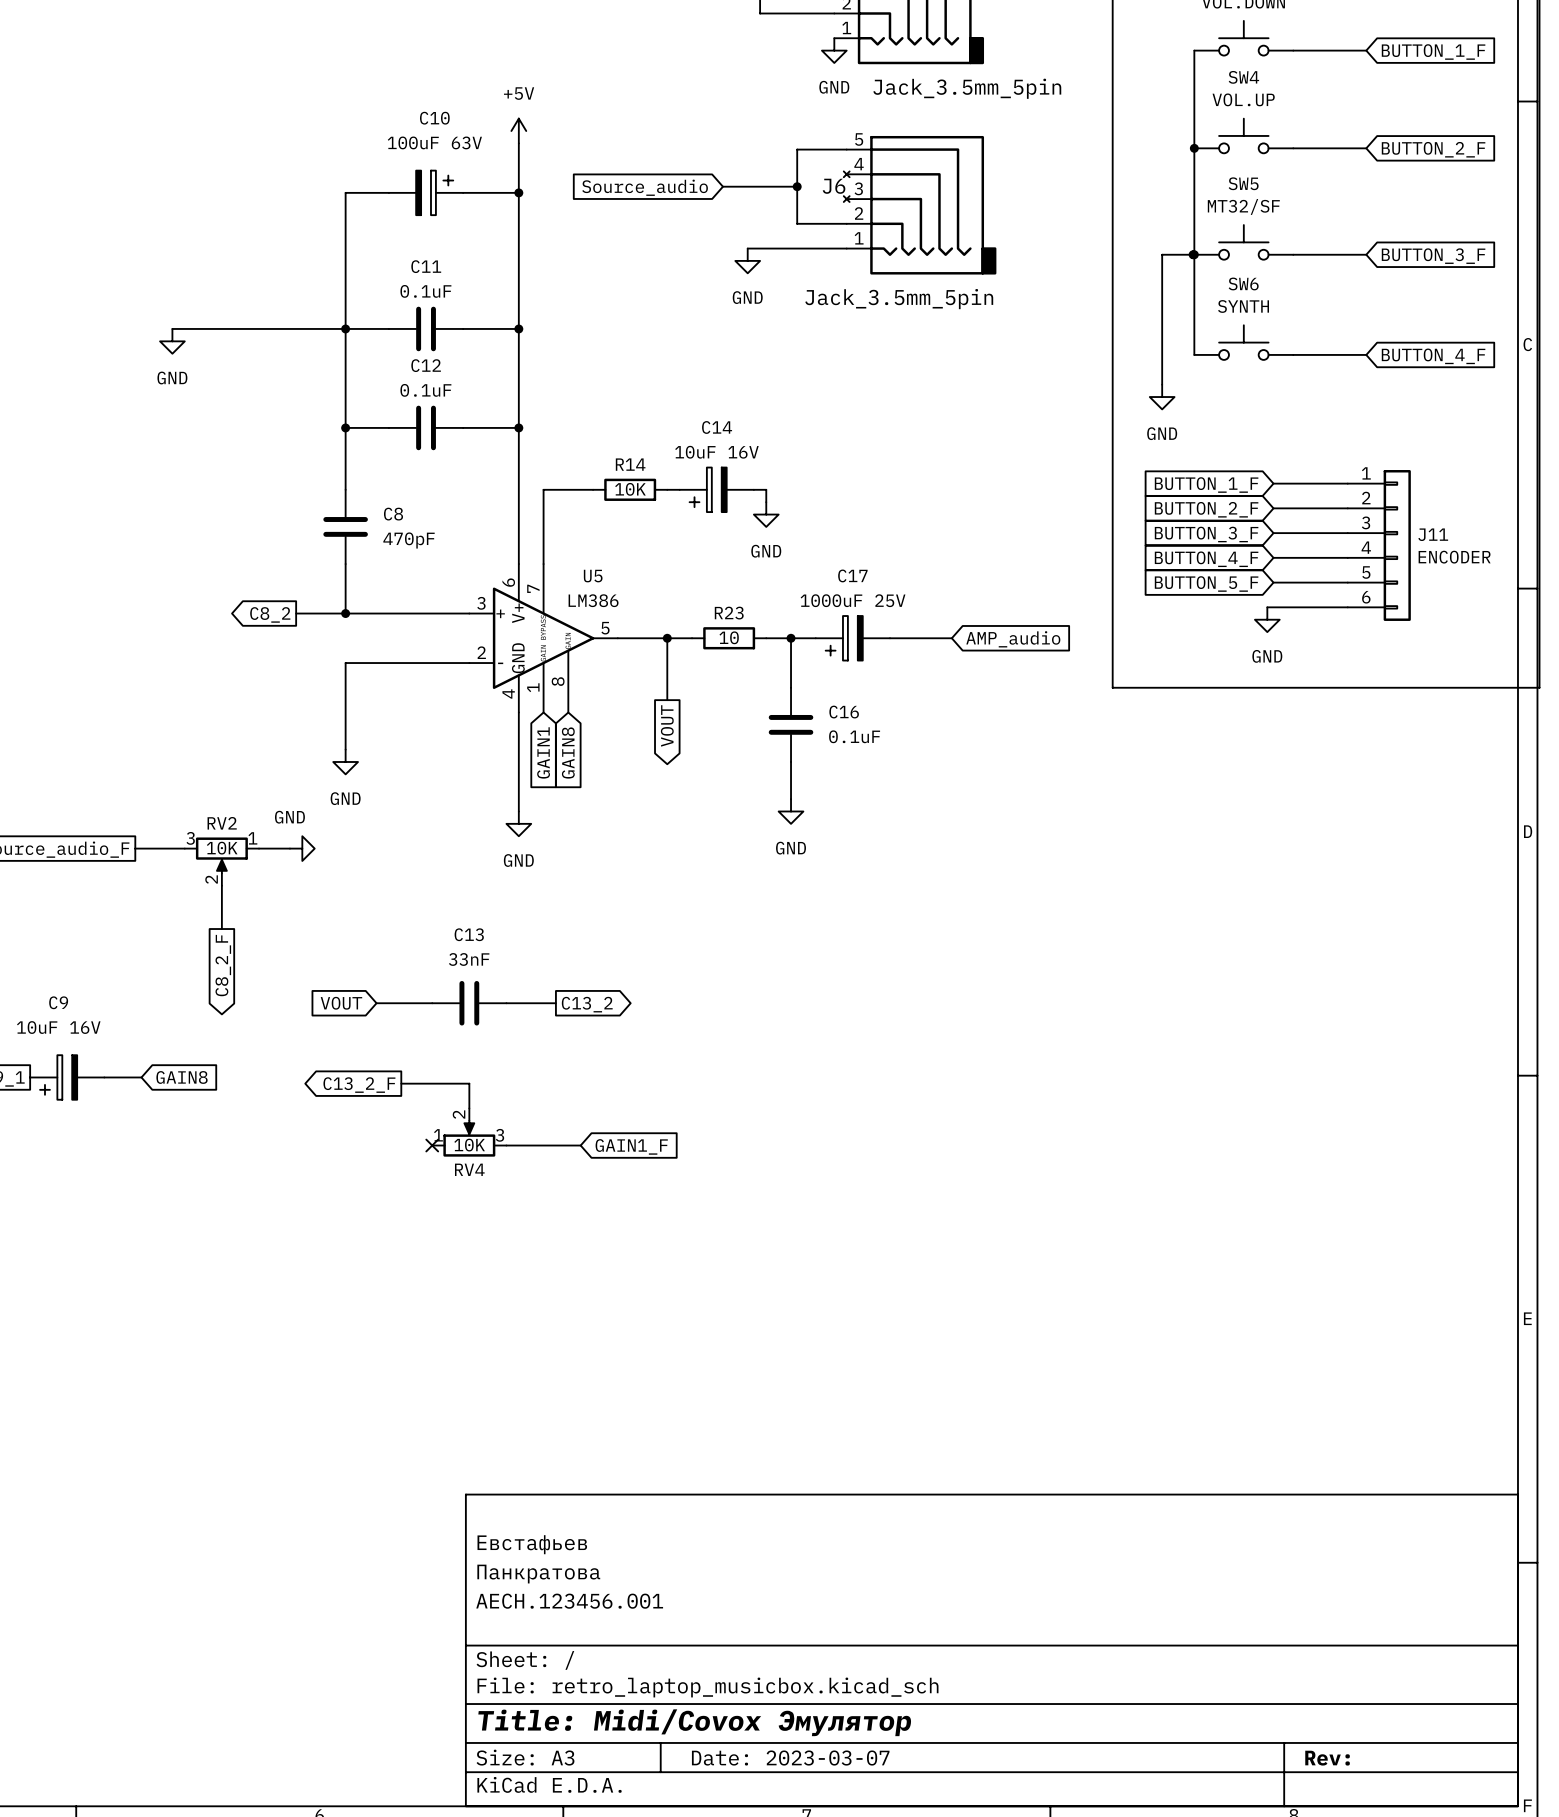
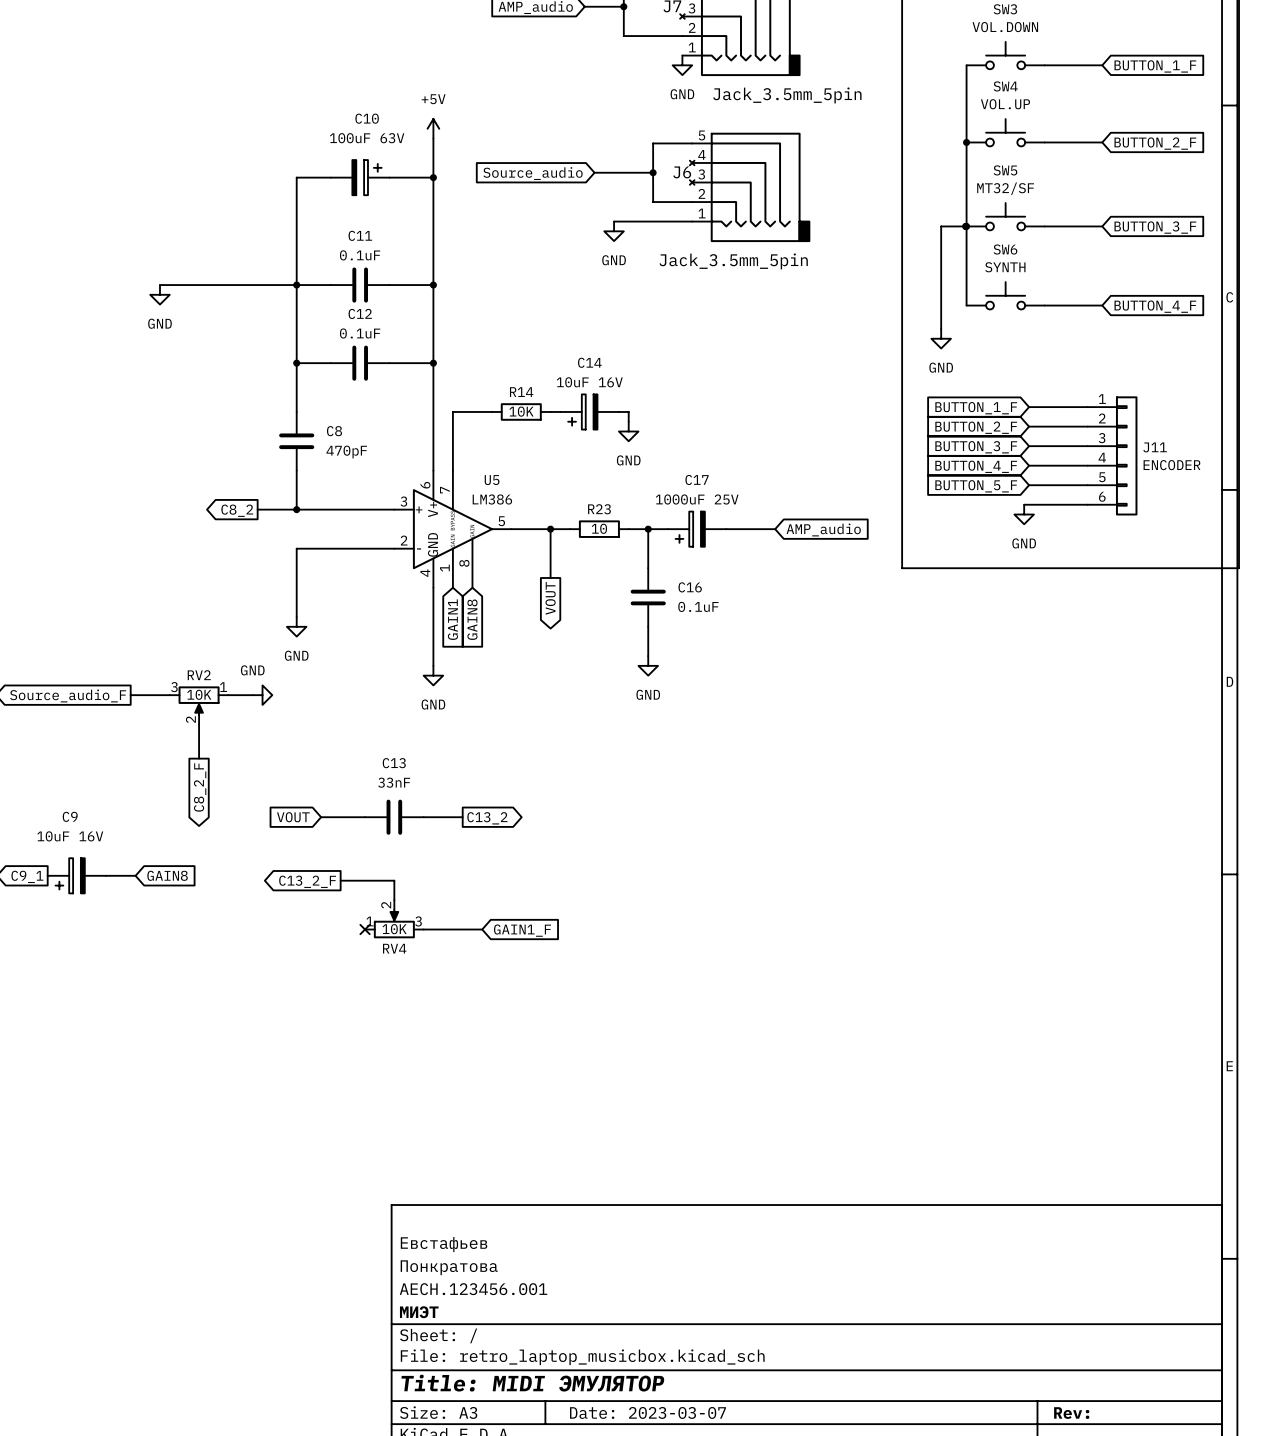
title block: Панкратова (538, 1574) -> Понкратова (449, 1267)
title block: none -> МИЭТ (419, 1312)
title block: Title: Midi/Covox Эмулятор (694, 1722) -> Title: MIDI ЭМУЛЯТОР (532, 1383)

